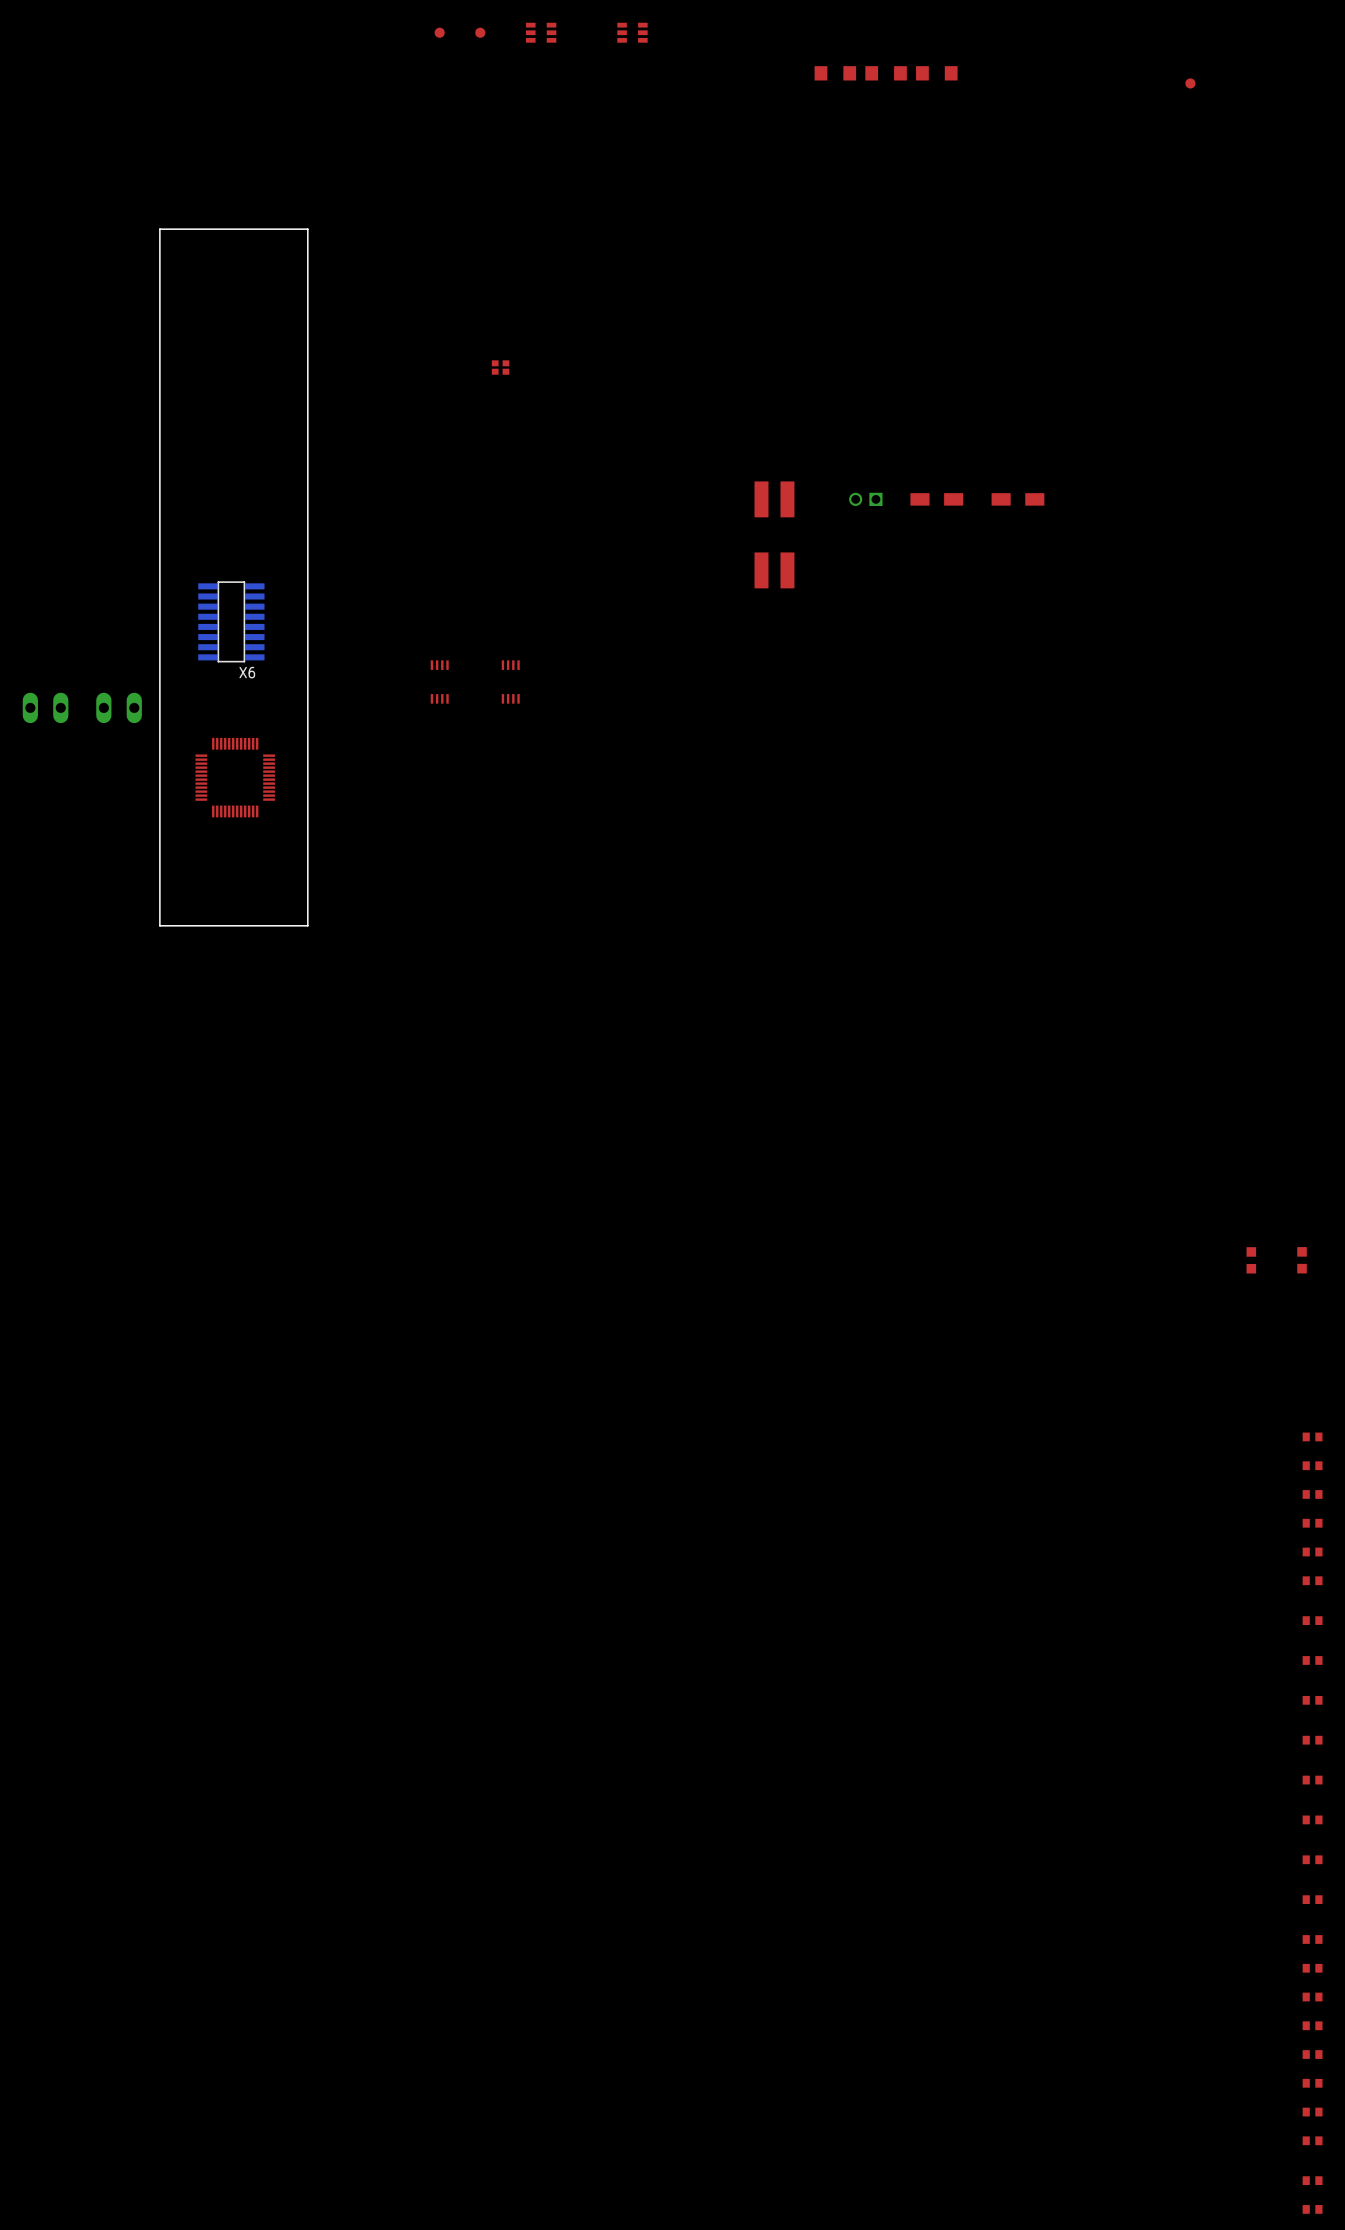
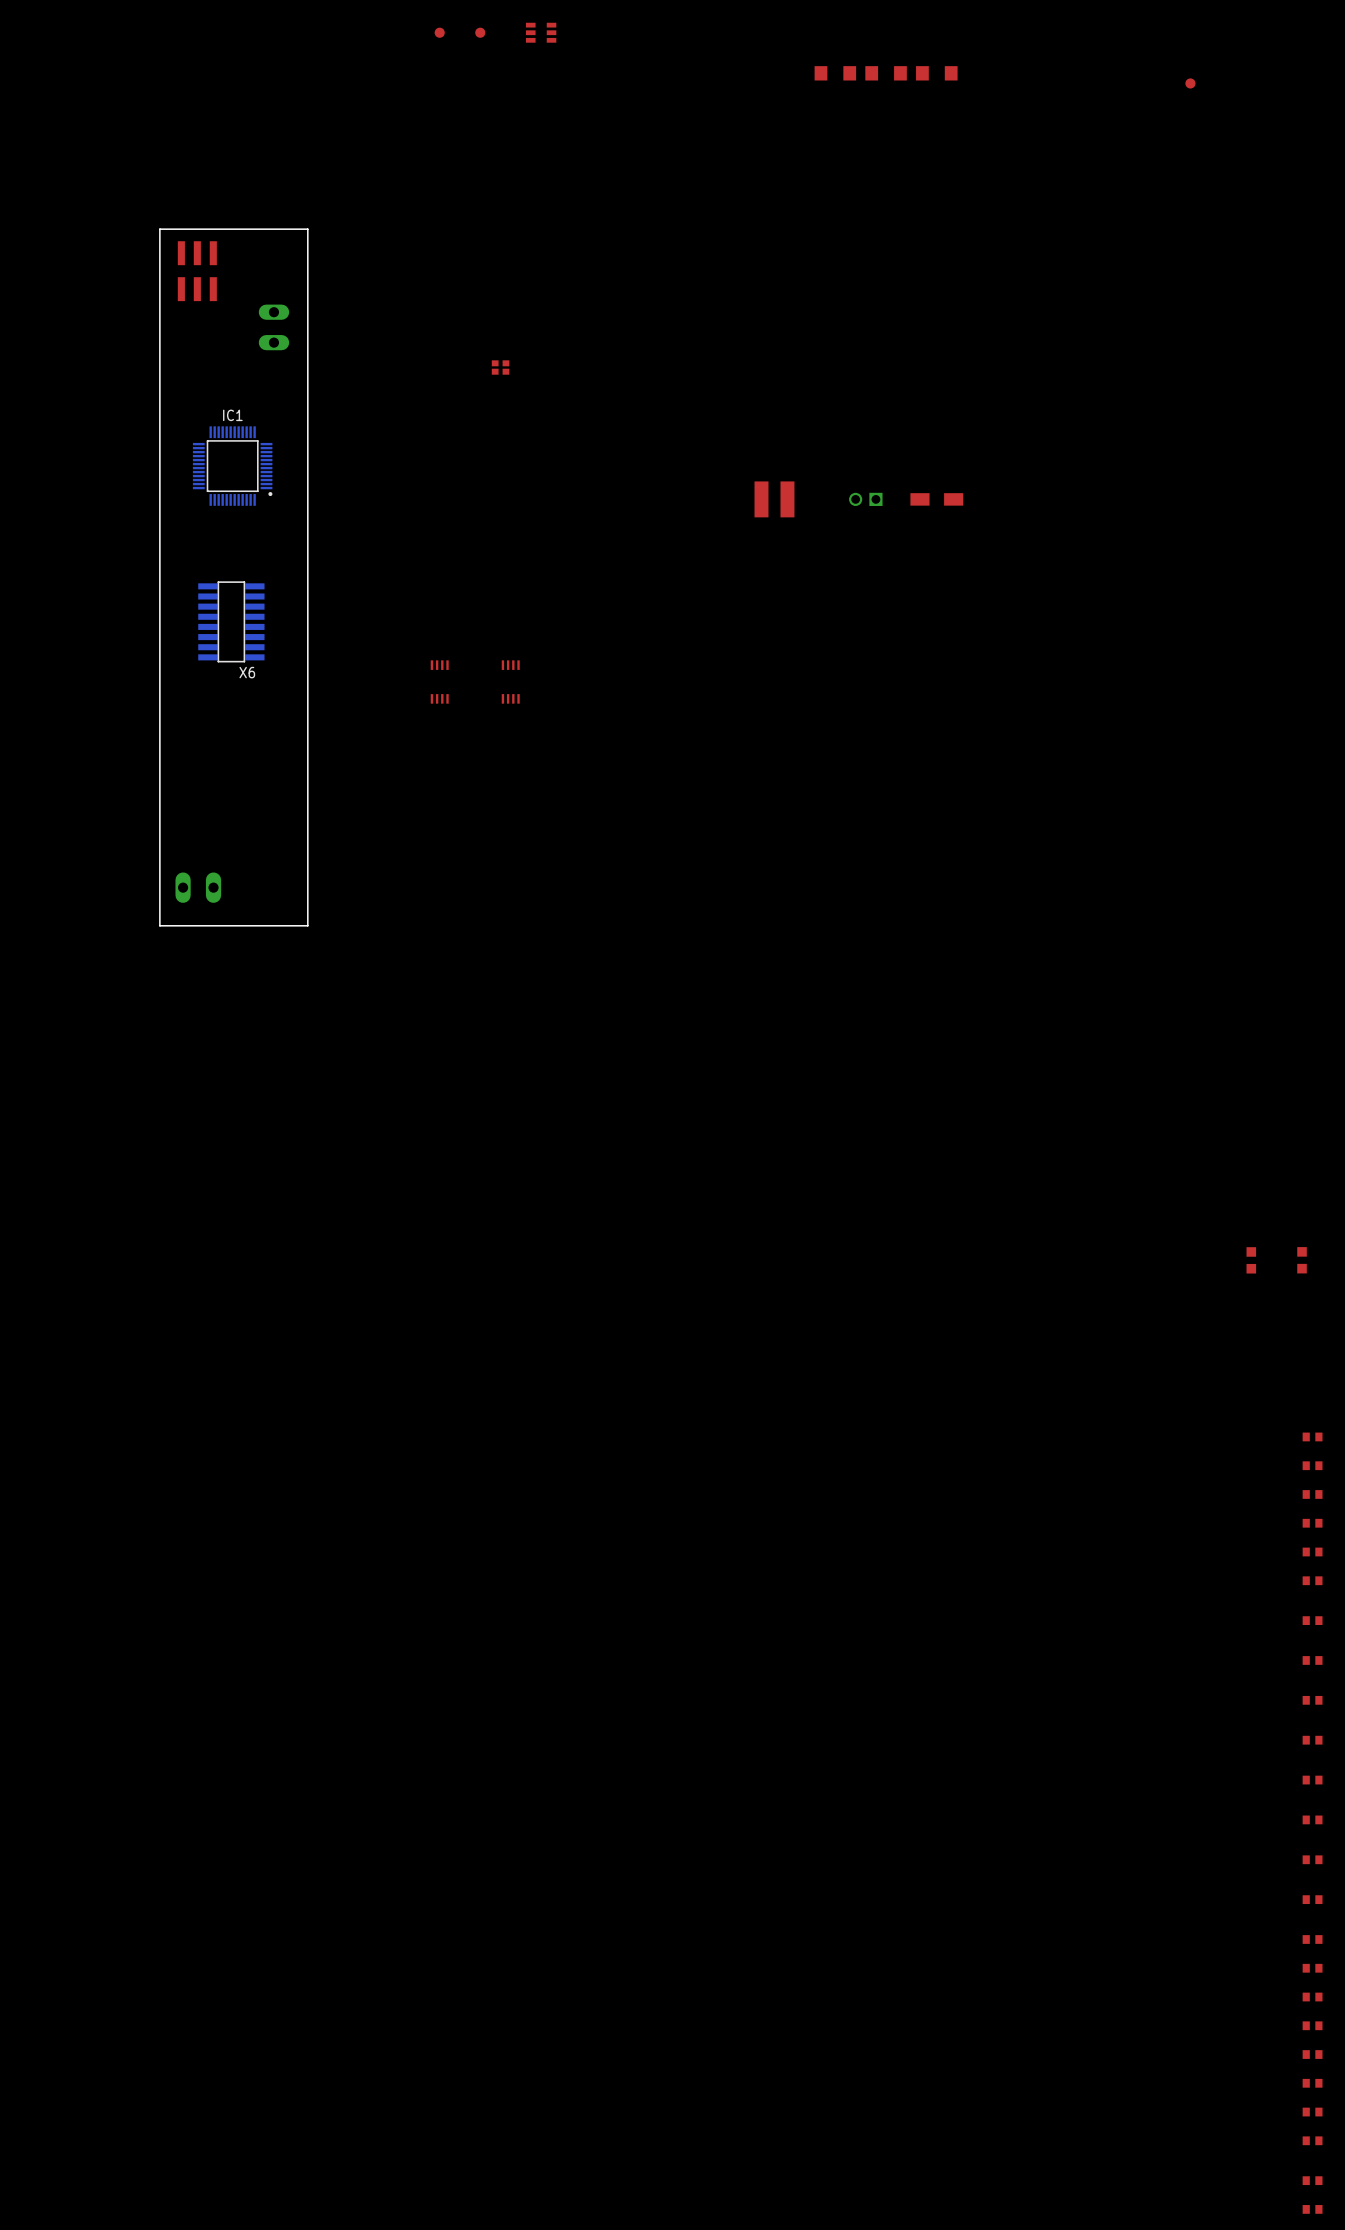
part: (632, 32) -> none
part: none -> (197, 271)
part: none -> (273, 327)
IC1: none -> (232, 466)
part: (1017, 499) -> none
part: (774, 570) -> none
part: (45, 707) -> none
part: (119, 707) -> none
part: (235, 777) -> none
part: none -> (198, 887)

